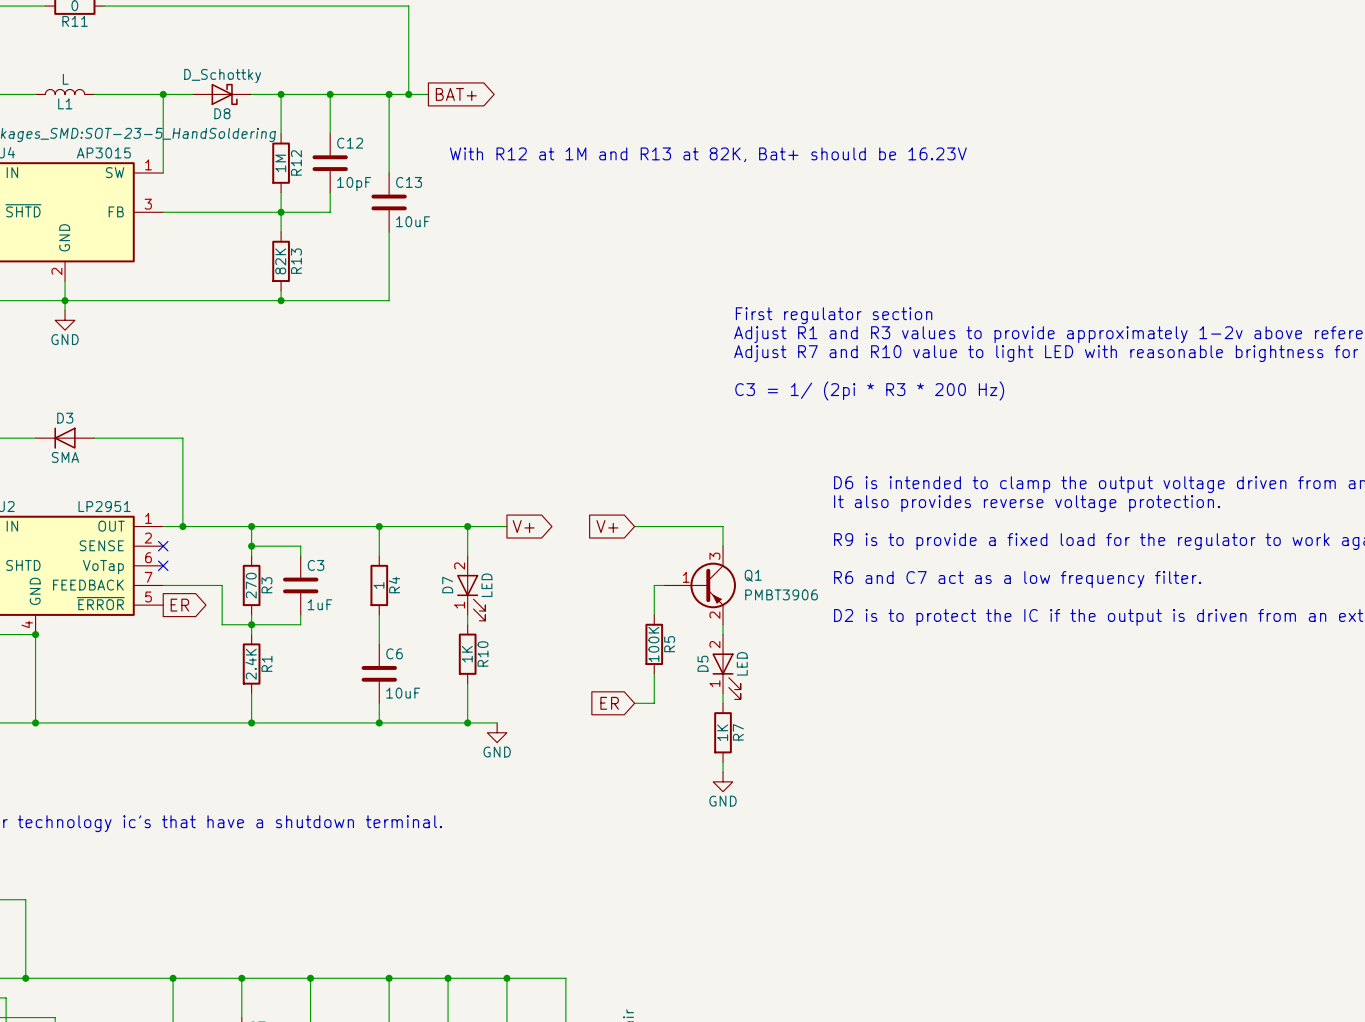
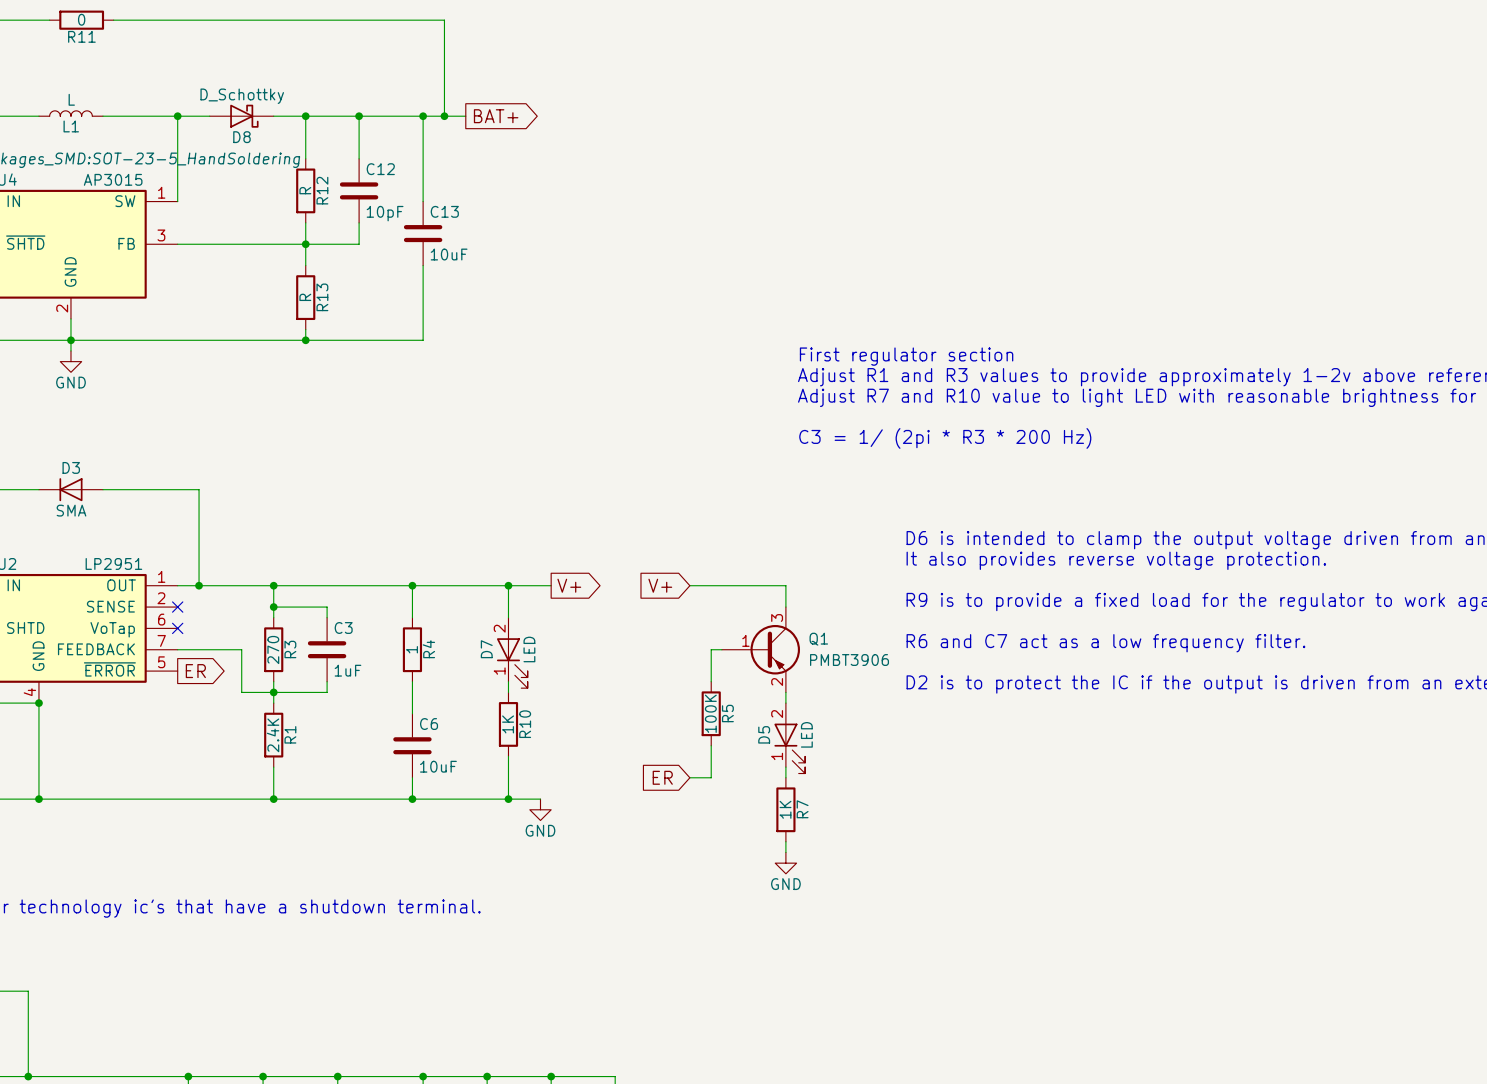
text: With R12 at 1M and R13 at 82K, Bat+ should be 16.23V (708, 154) -> none
R12 value: 1M (280, 163) -> R (305, 190)
R13 value: 82K (280, 261) -> R (305, 297)

